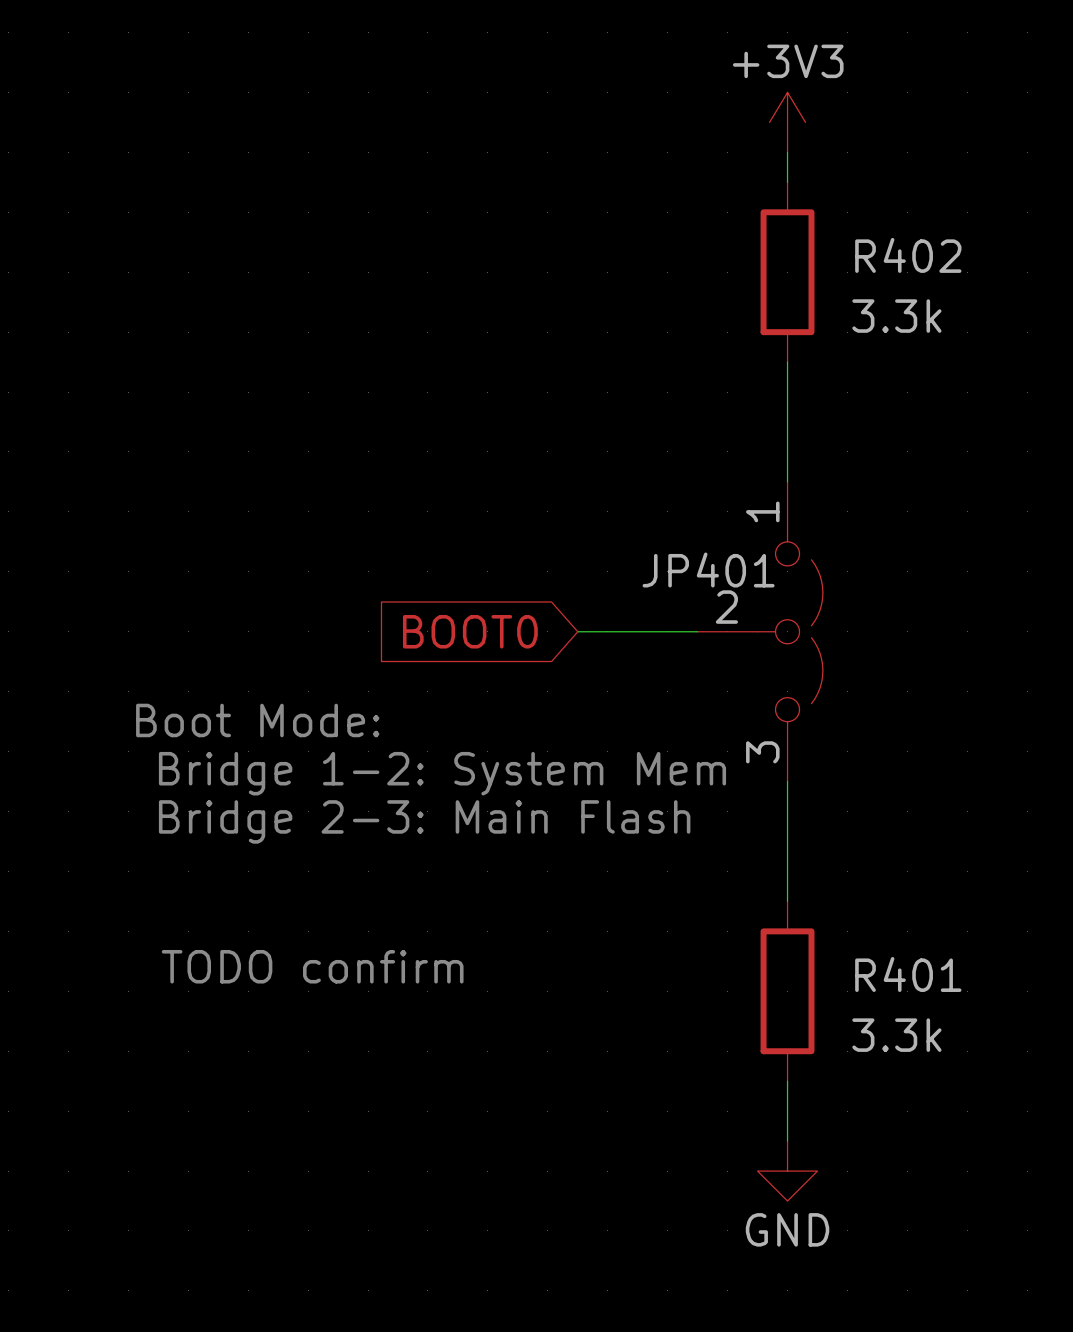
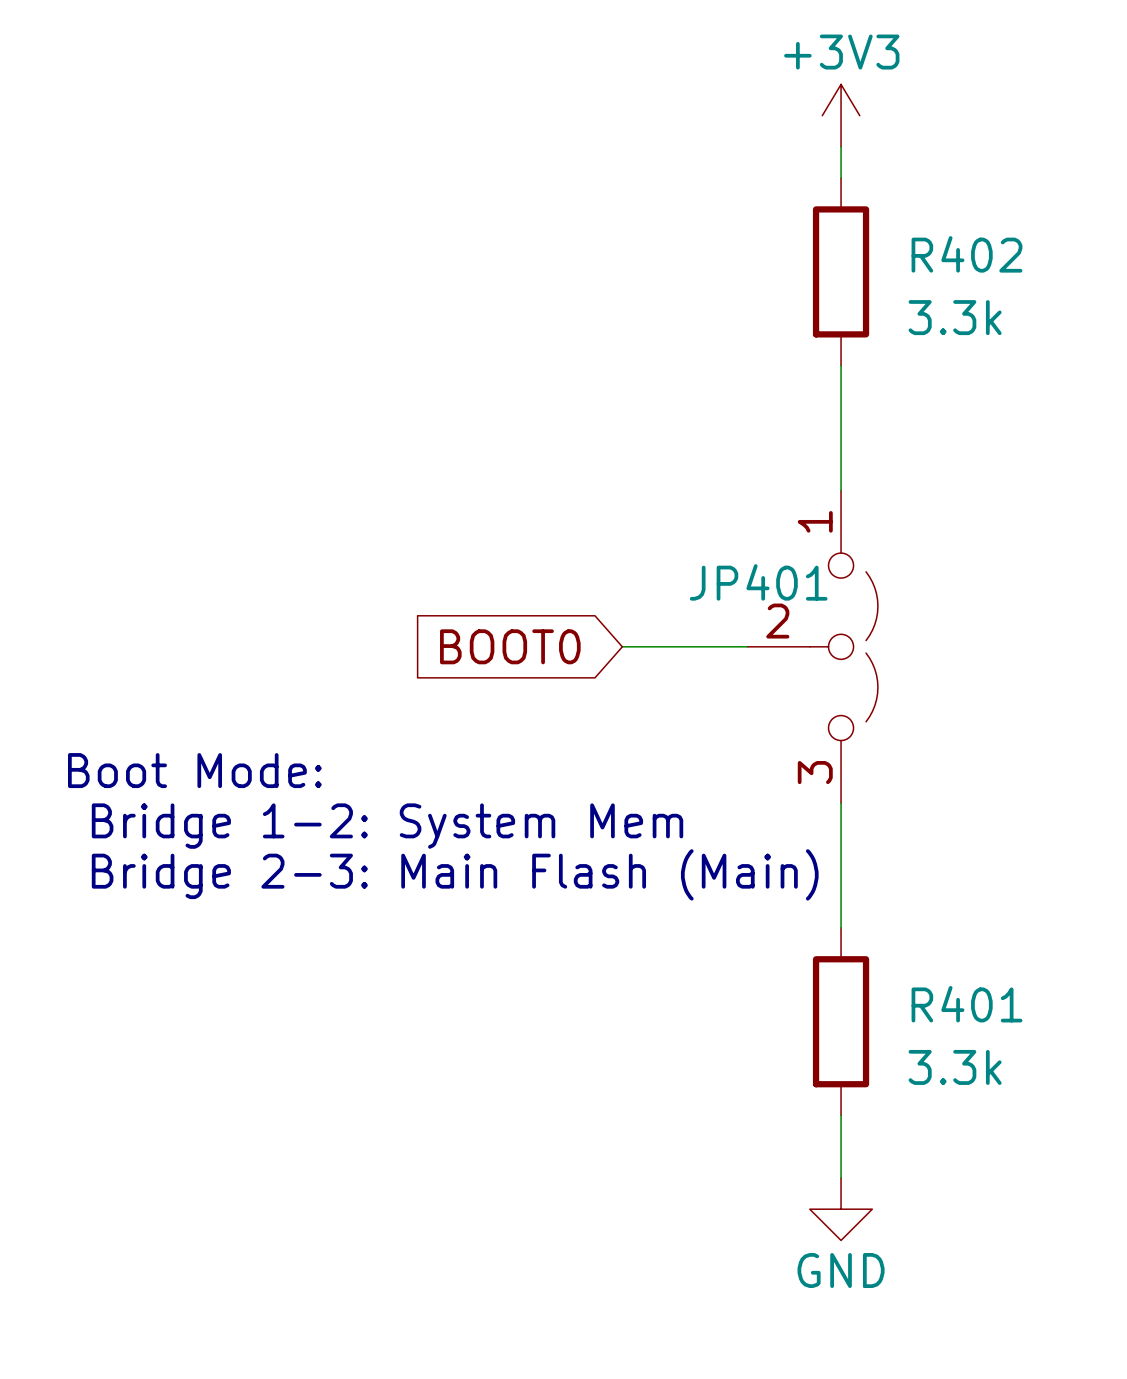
text position: Boot Mode: (257, 720) -> Boot Mode: (194, 770)
text position: Bridge 1-2: System Mem (442, 773) -> Bridge 1-2: System Mem (387, 826)
text: Bridge 2-3: Main Flash (424, 821) -> Bridge 2-3: Main Flash (Main) (455, 874)
text: TODO confirm (312, 966) -> none

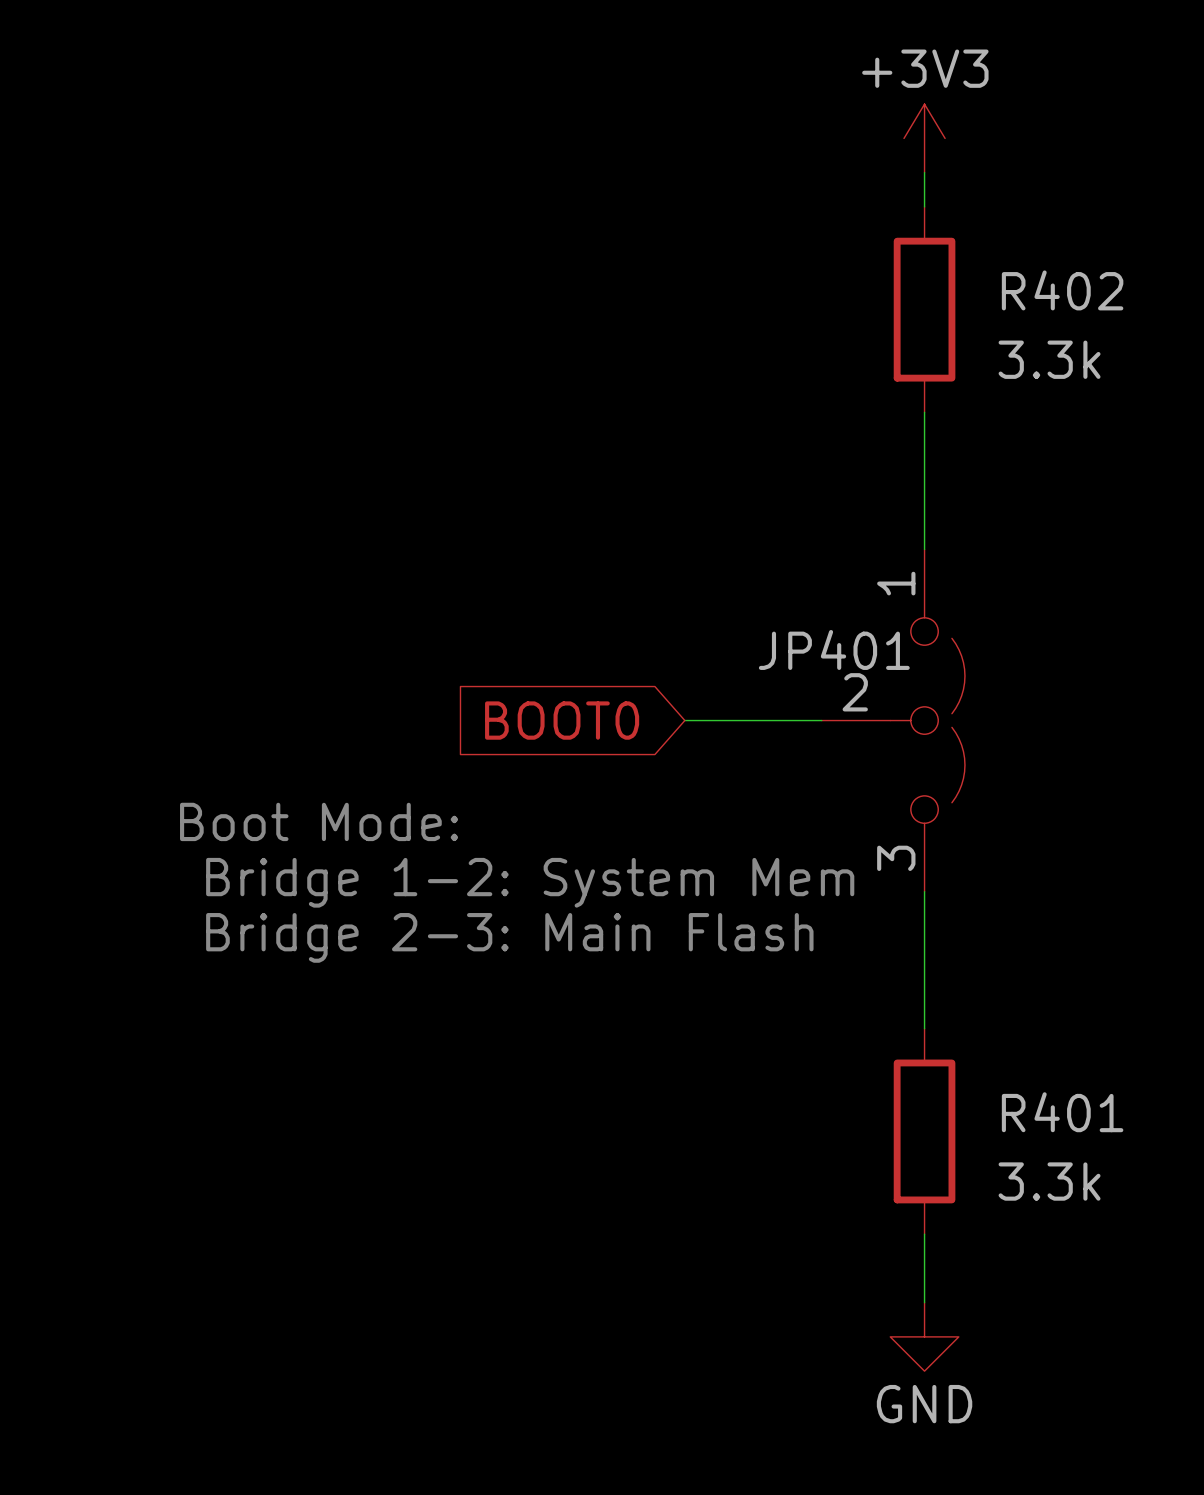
text position: Boot Mode: (194, 770) -> Boot Mode: (319, 821)
text position: Bridge 1-2: System Mem (387, 826) -> Bridge 1-2: System Mem (530, 882)
text: Bridge 2-3: Main Flash (Main) (455, 874) -> Bridge 2-3: Main Flash (509, 937)

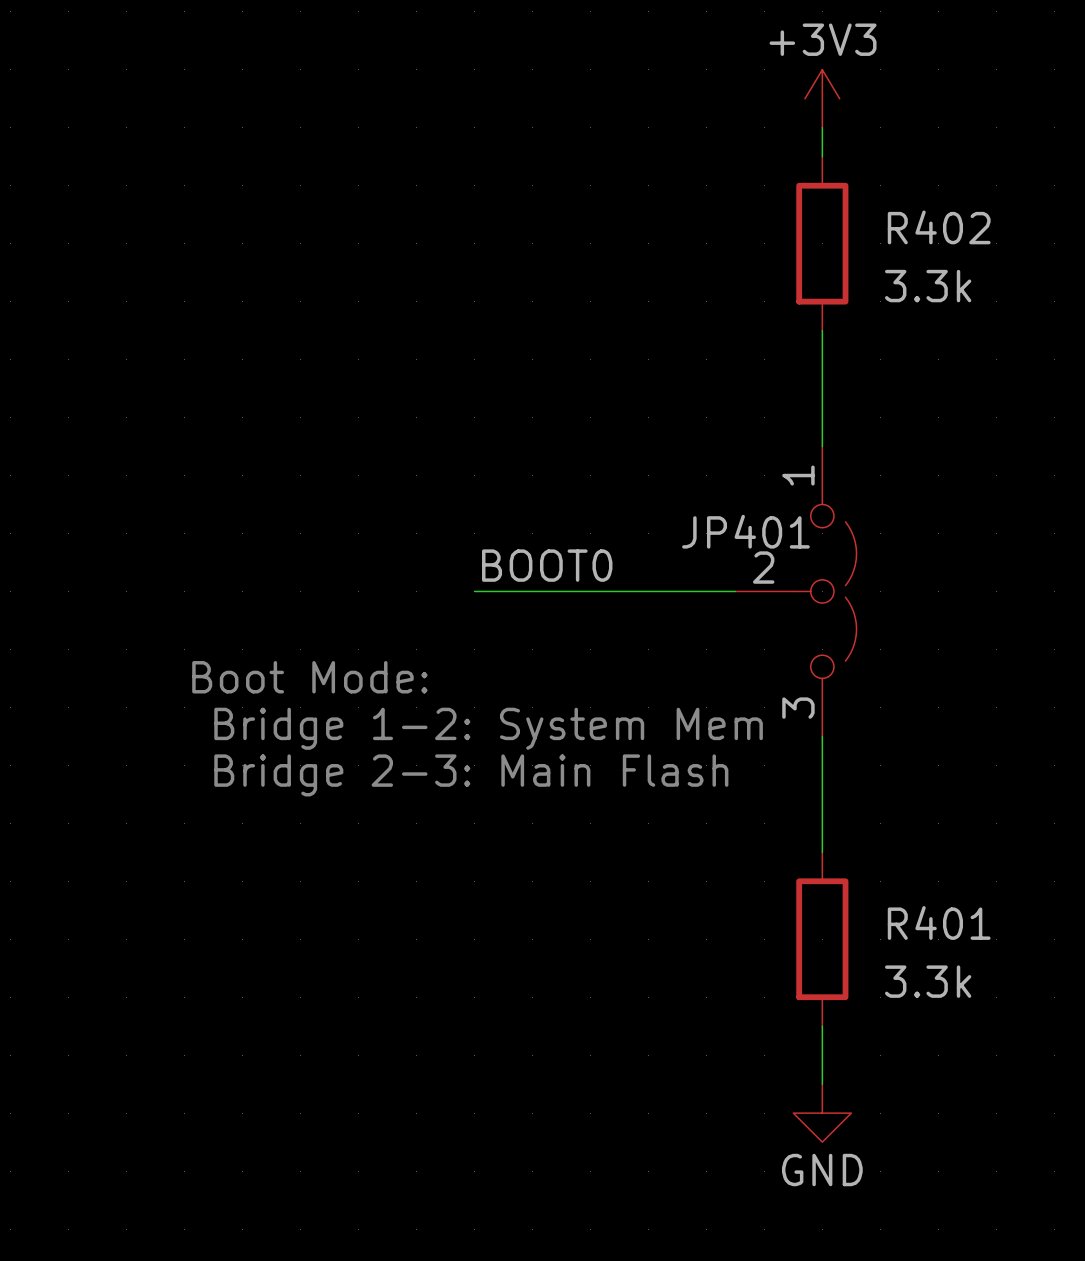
label: none -> BOOT0 (547, 565)
wire: none -> (474, 591) (619, 591)
global label: BOOT0 (562, 720) -> none

